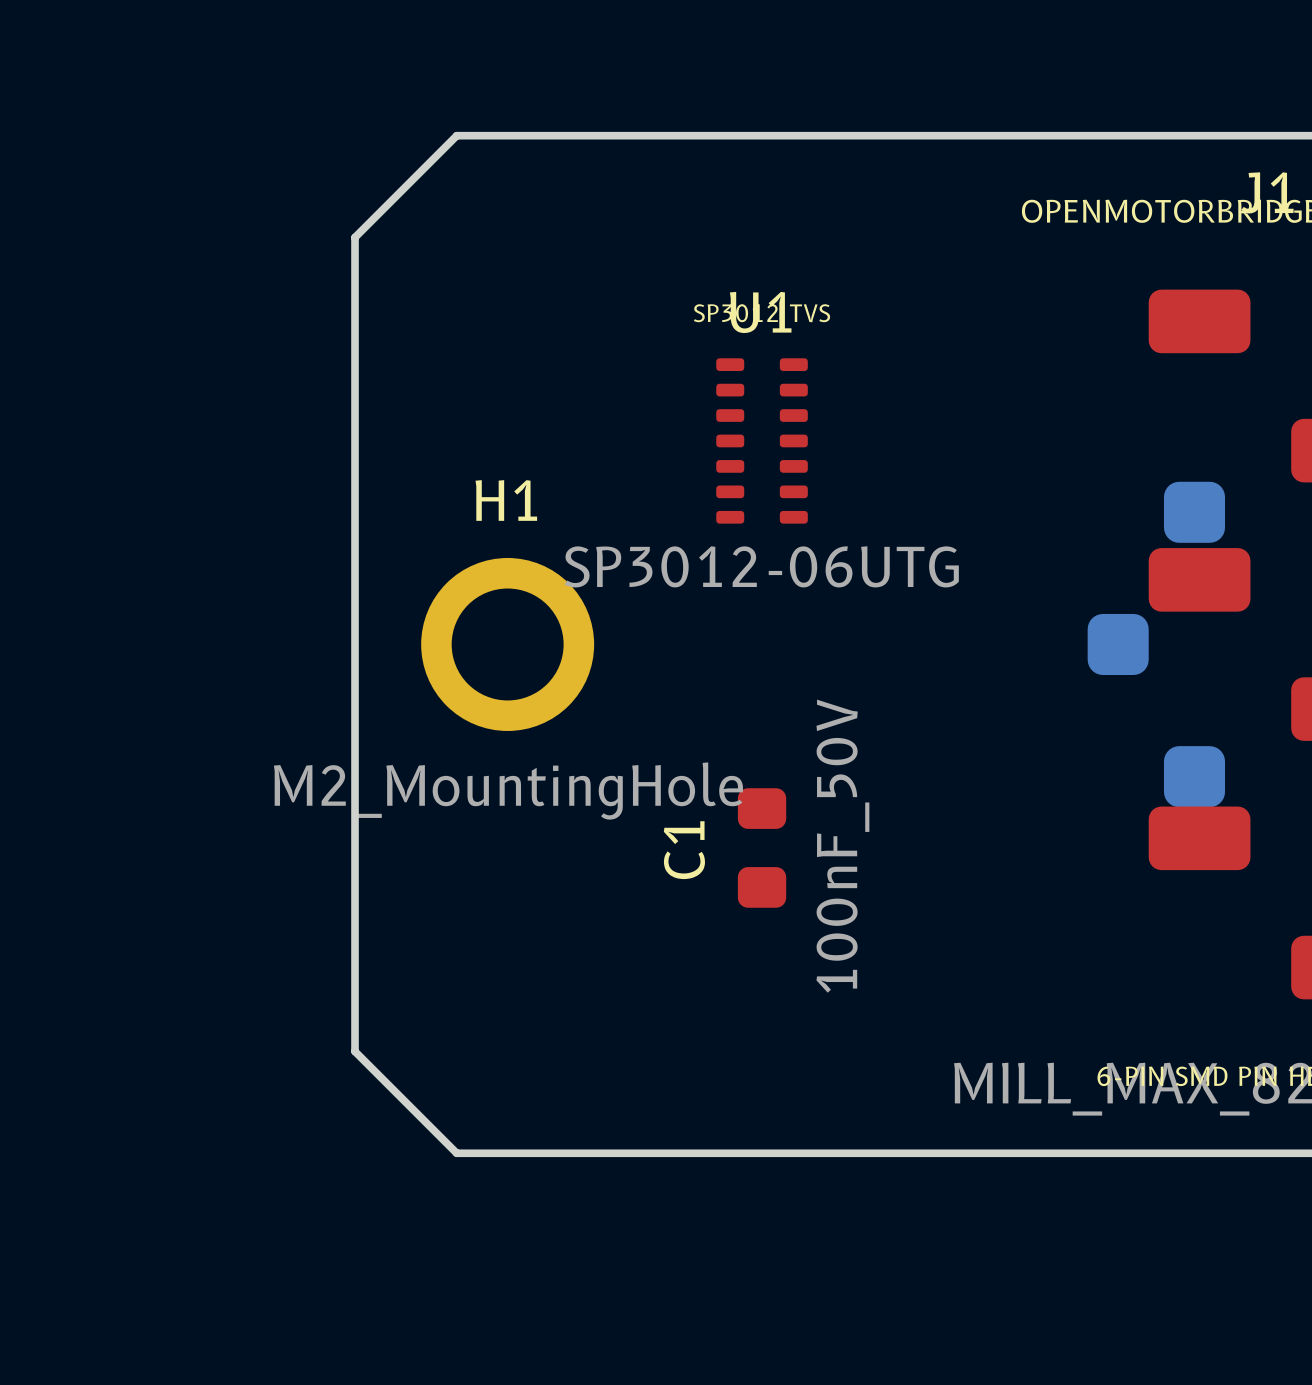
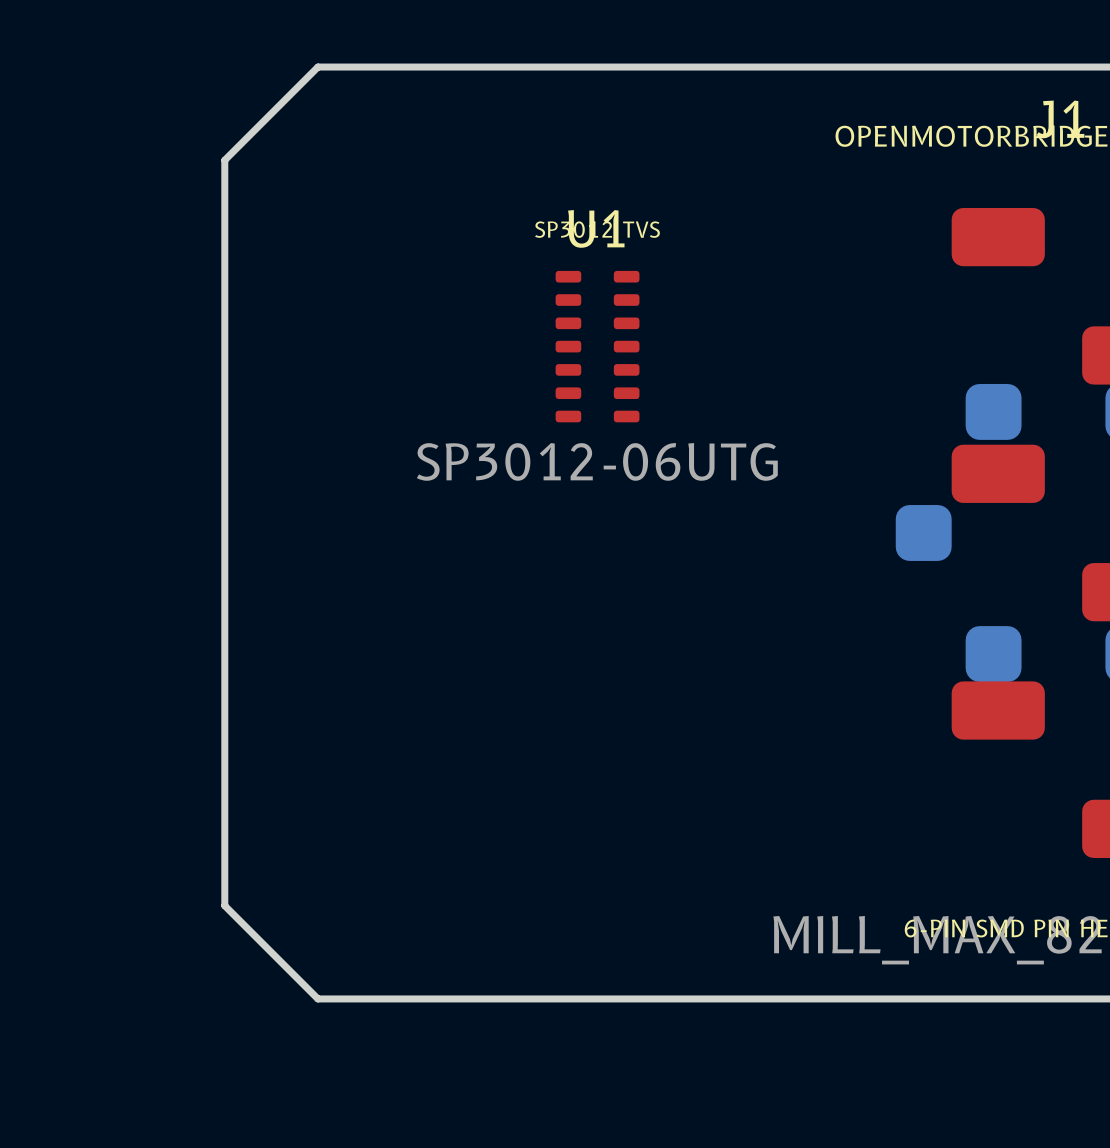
H1: M2_MountingHole (507, 644) -> none
C1: 100nF_50V (762, 847) -> none

